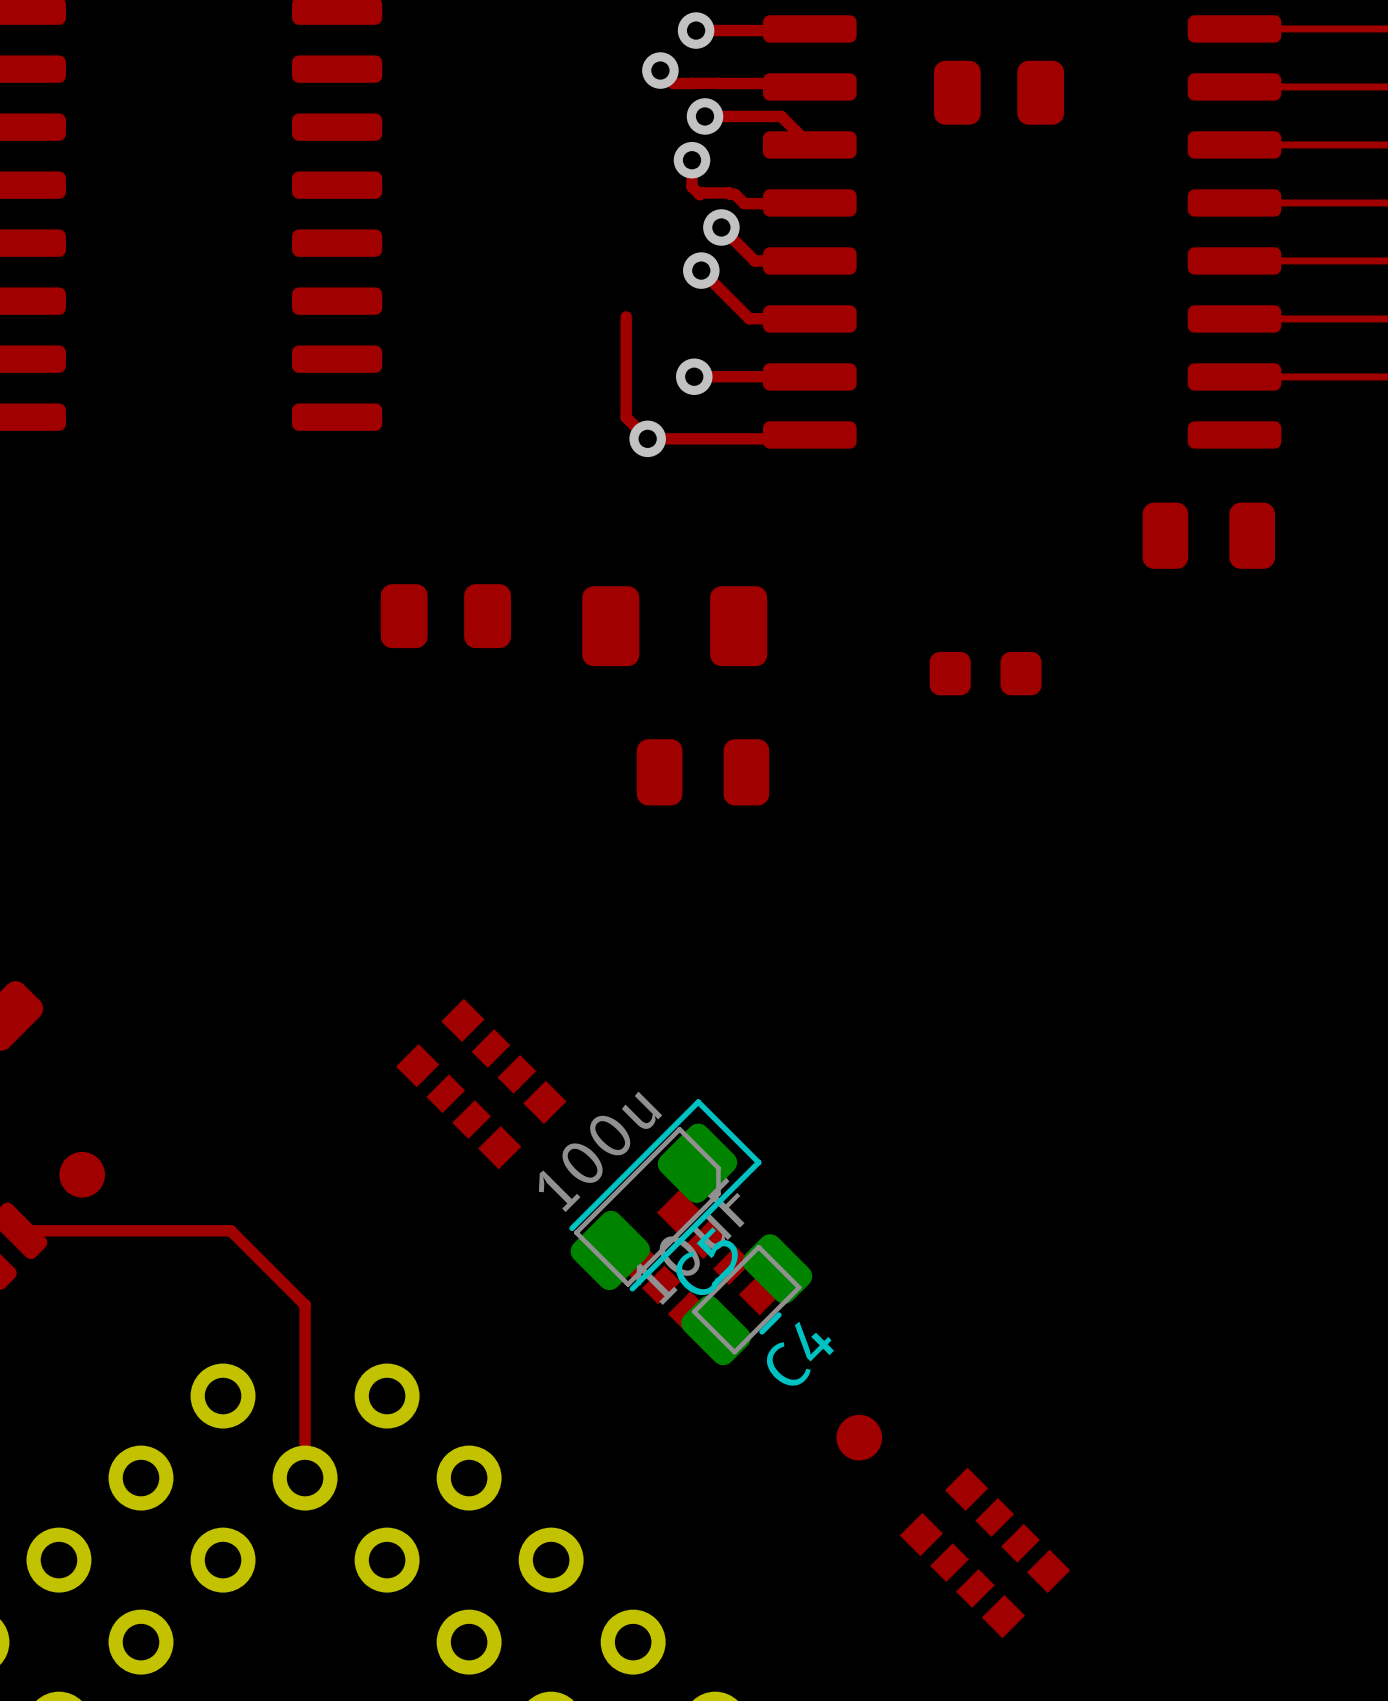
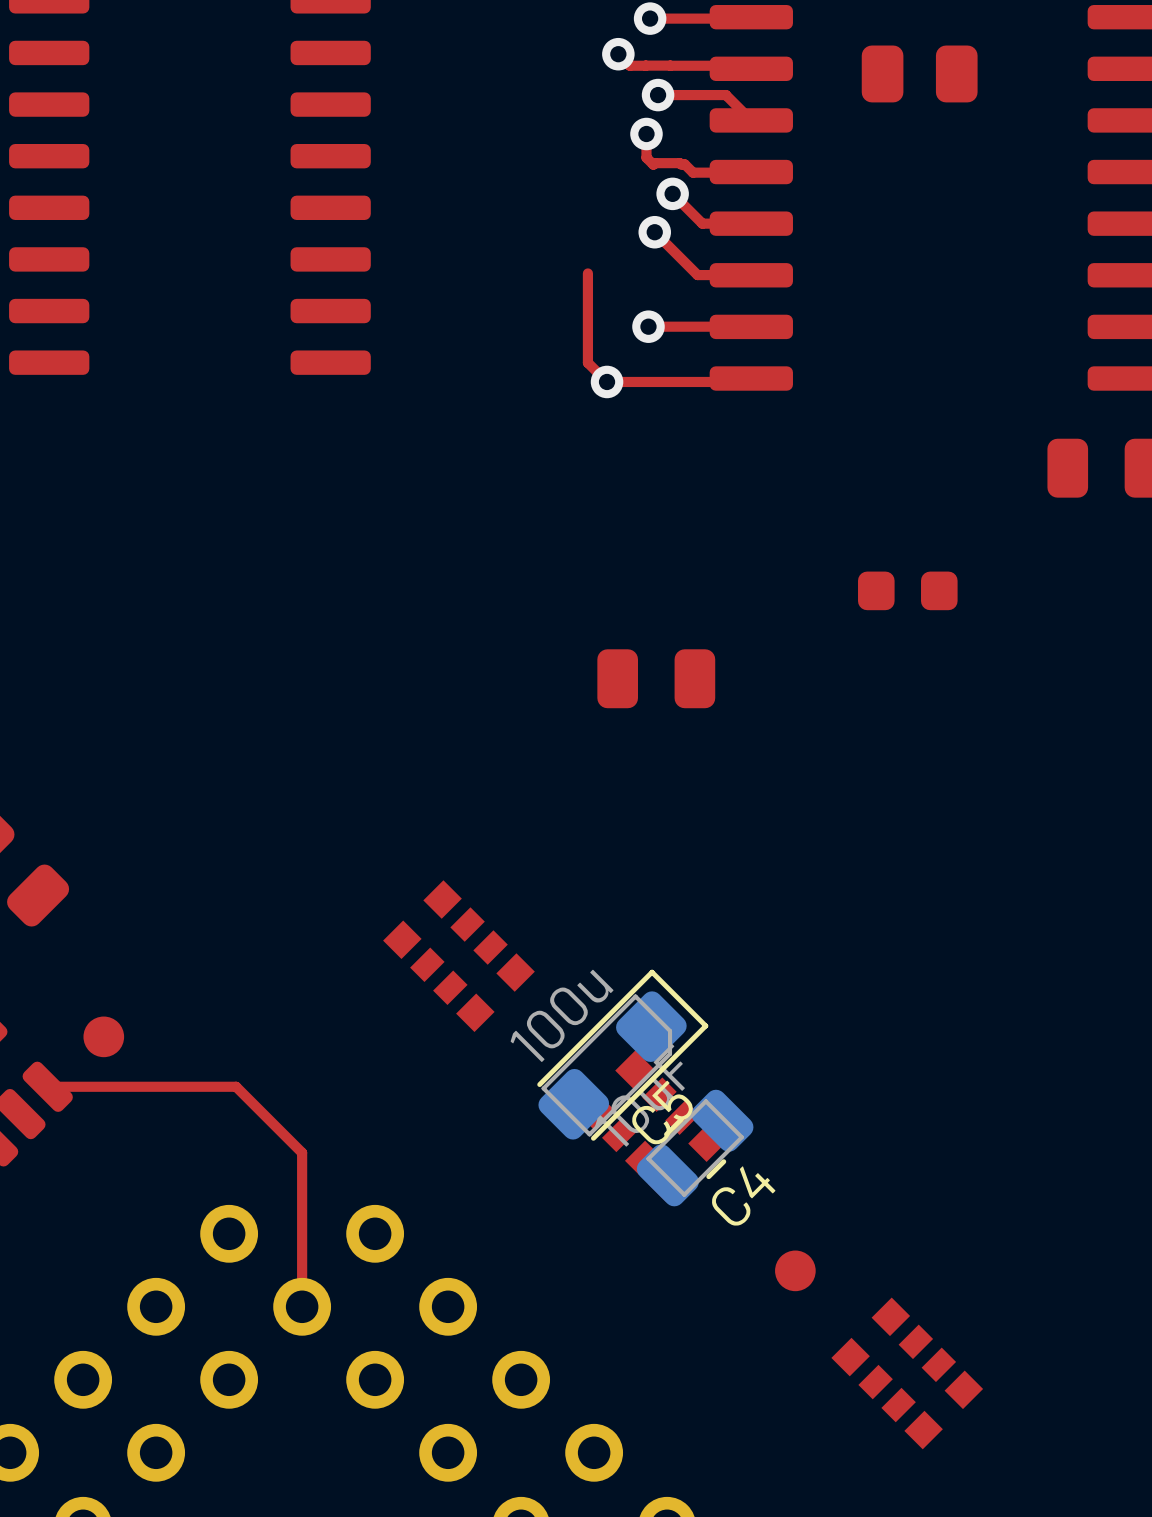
part: (445, 616) -> none
part: (674, 626) -> none

